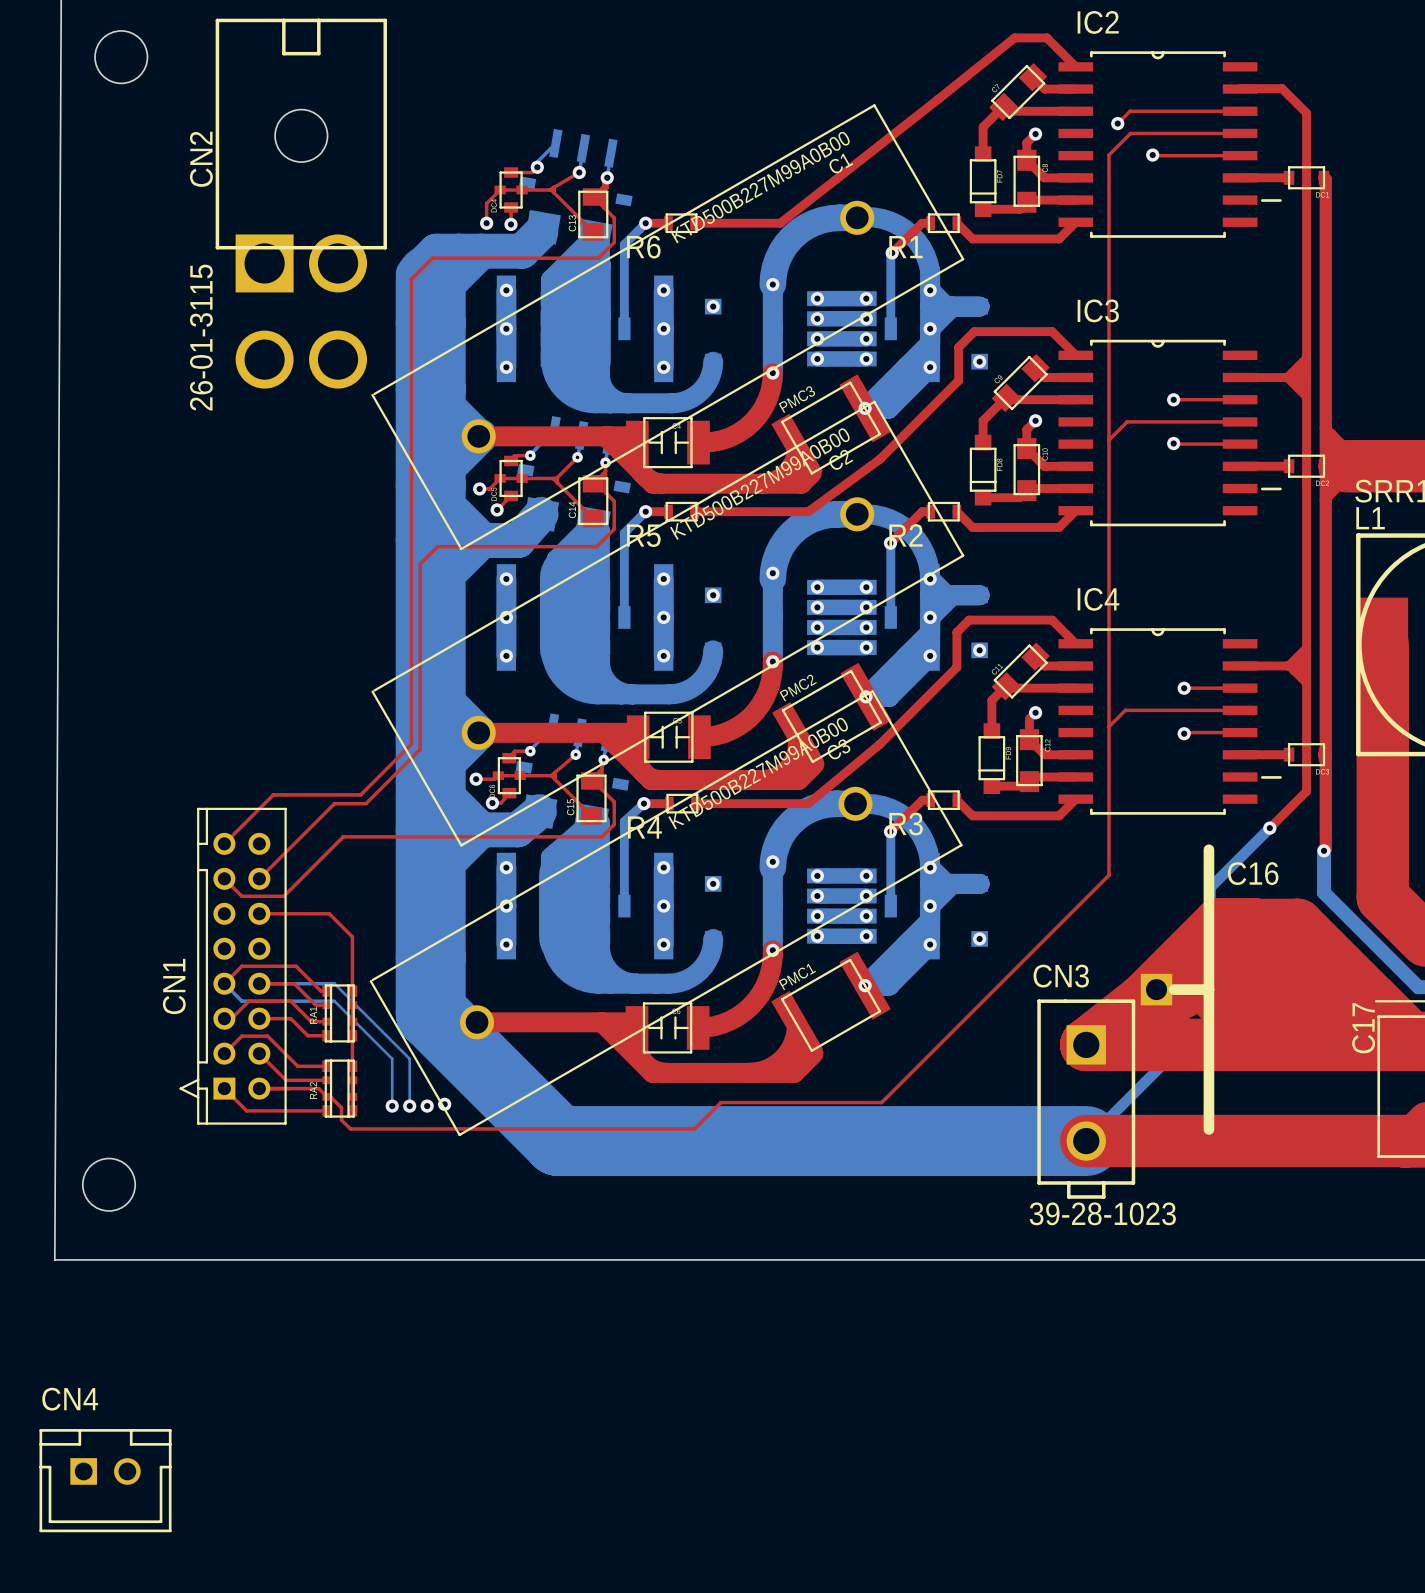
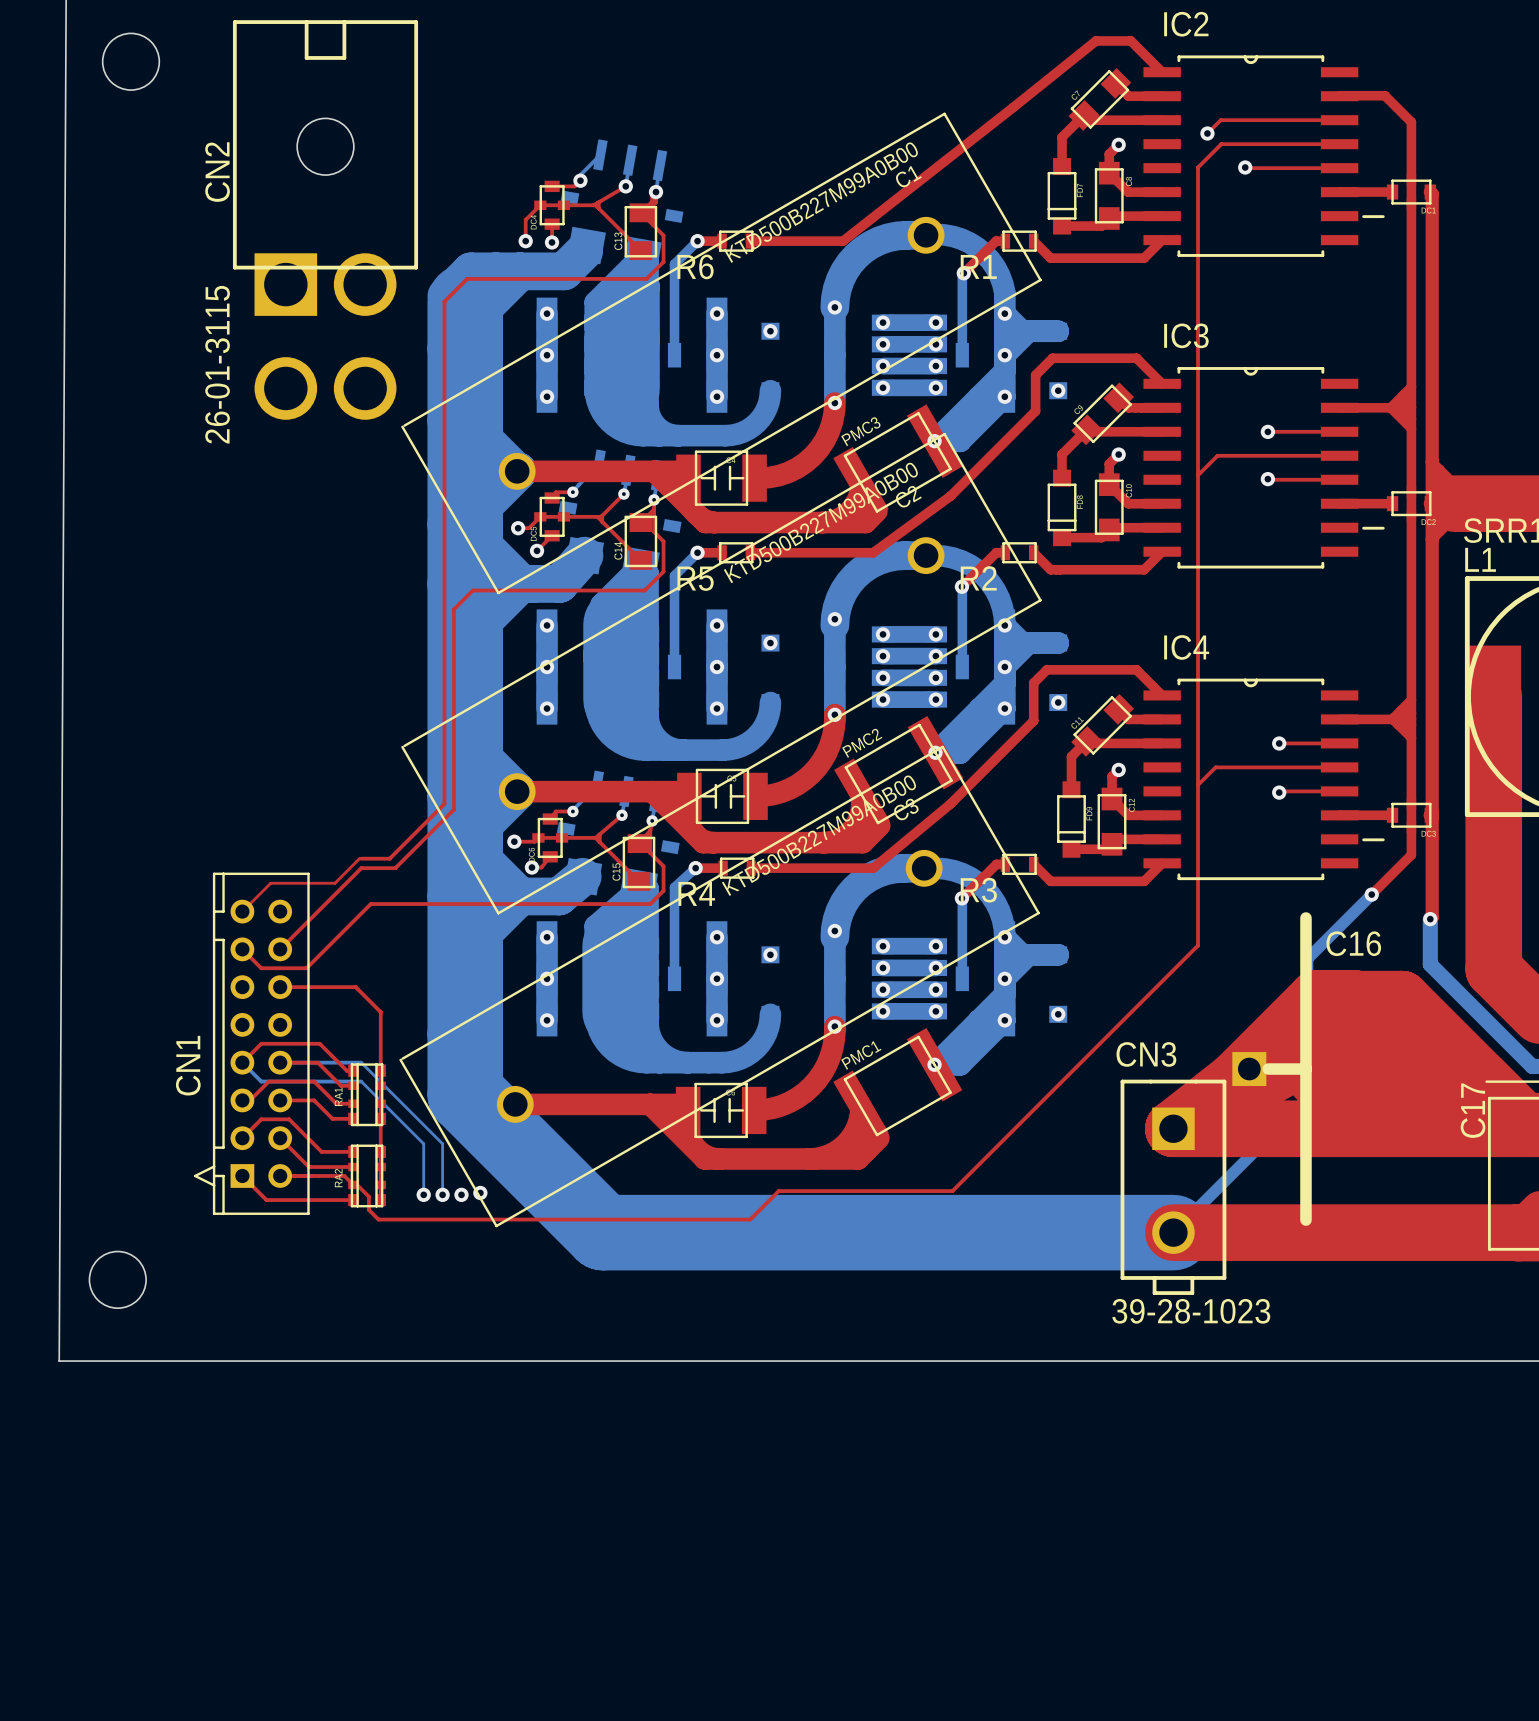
top track: (273, 794) (332, 794) -> (270, 883) (334, 883) (359, 858)
top track: (273, 794) (225, 842) -> none
CN4: (105, 1480) -> none

